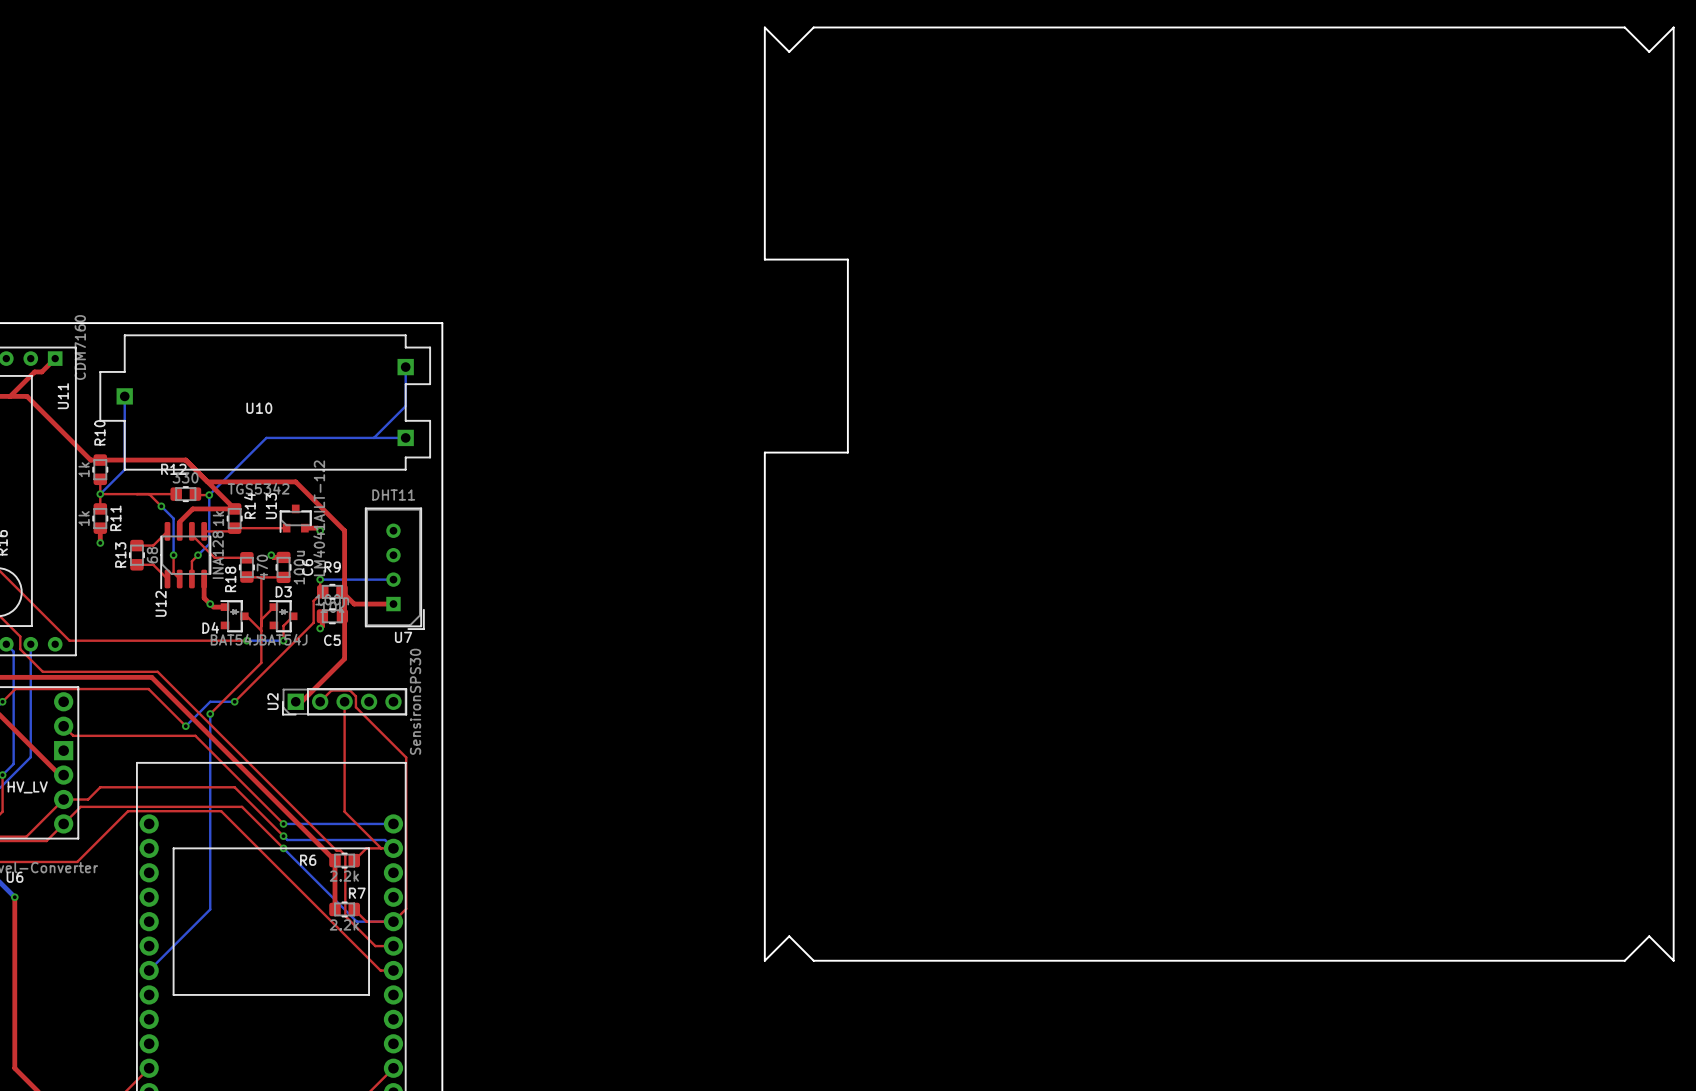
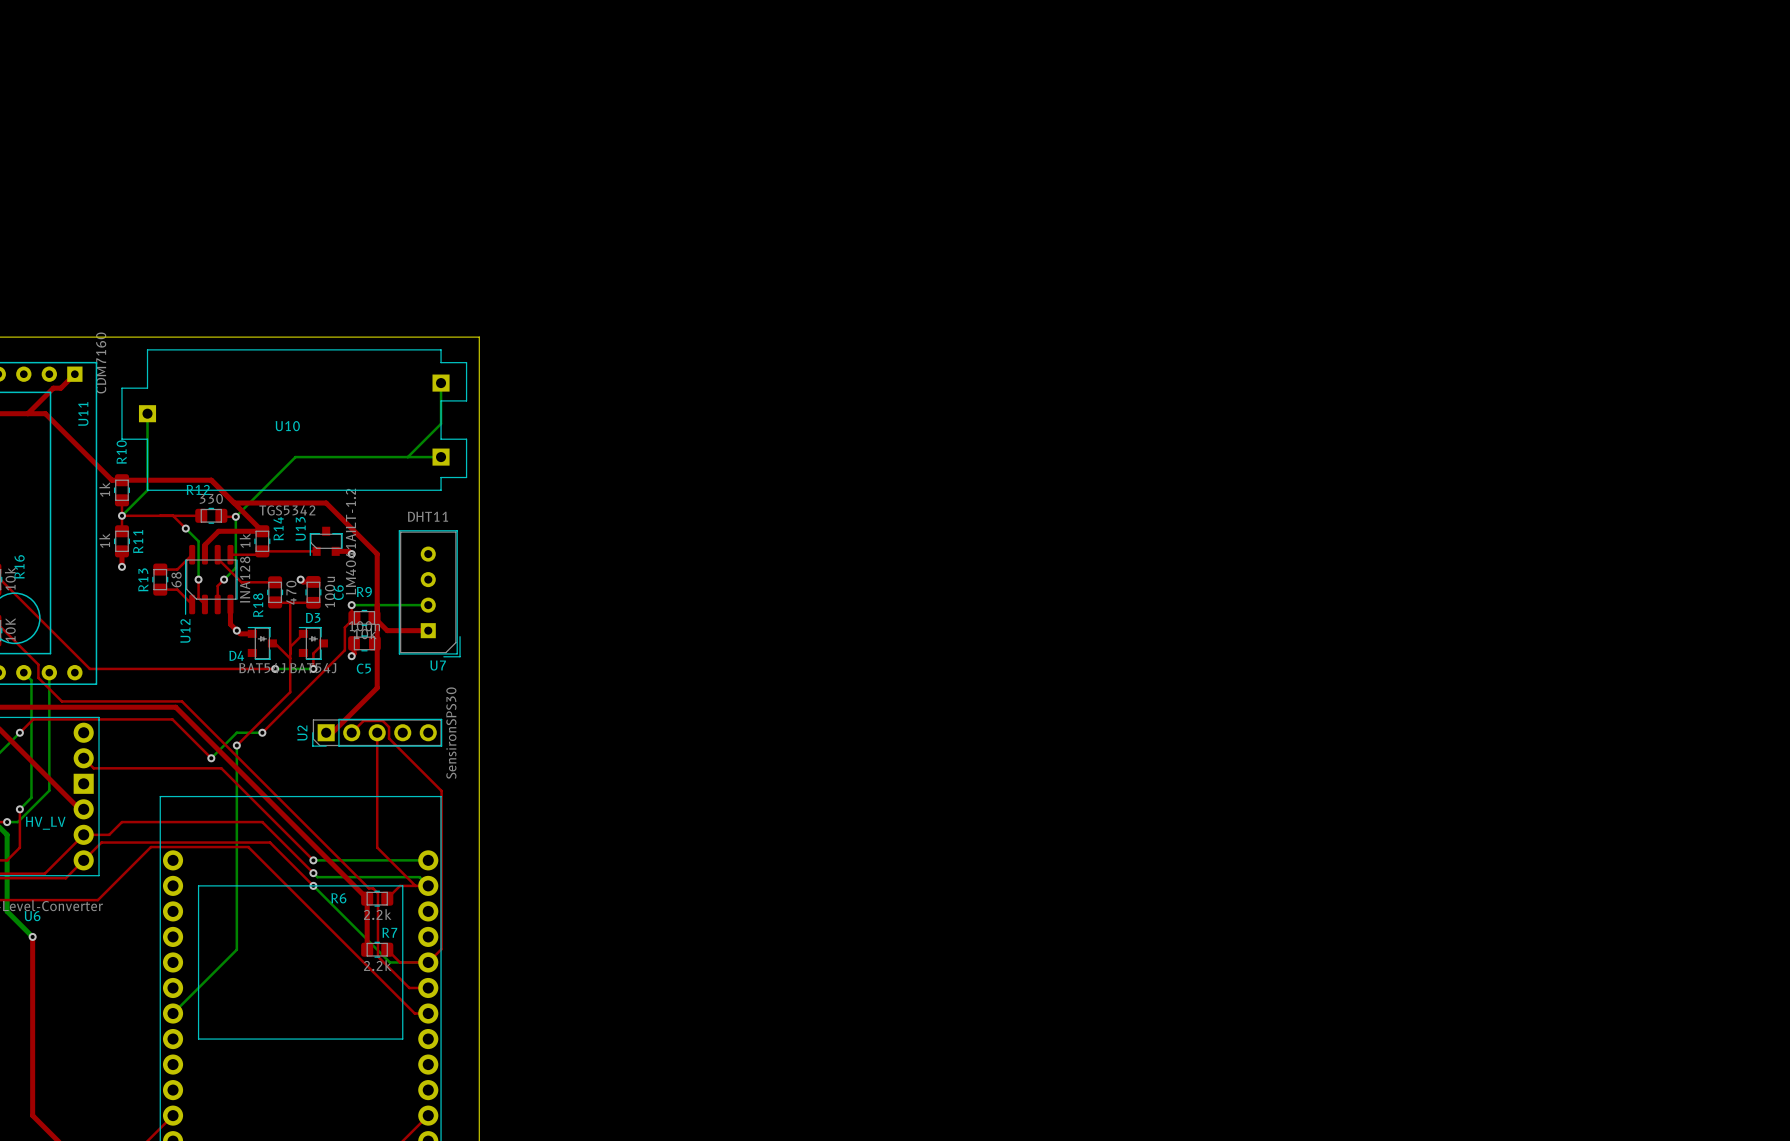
board edge: (764, 27) (764, 259) (847, 259) (847, 452) (764, 452) (764, 960) (789, 936) (813, 960) (1624, 960) (1649, 936) (1673, 960) (1673, 27) (1649, 51) (1624, 27) (813, 27) (789, 51) (764, 27) -> none

